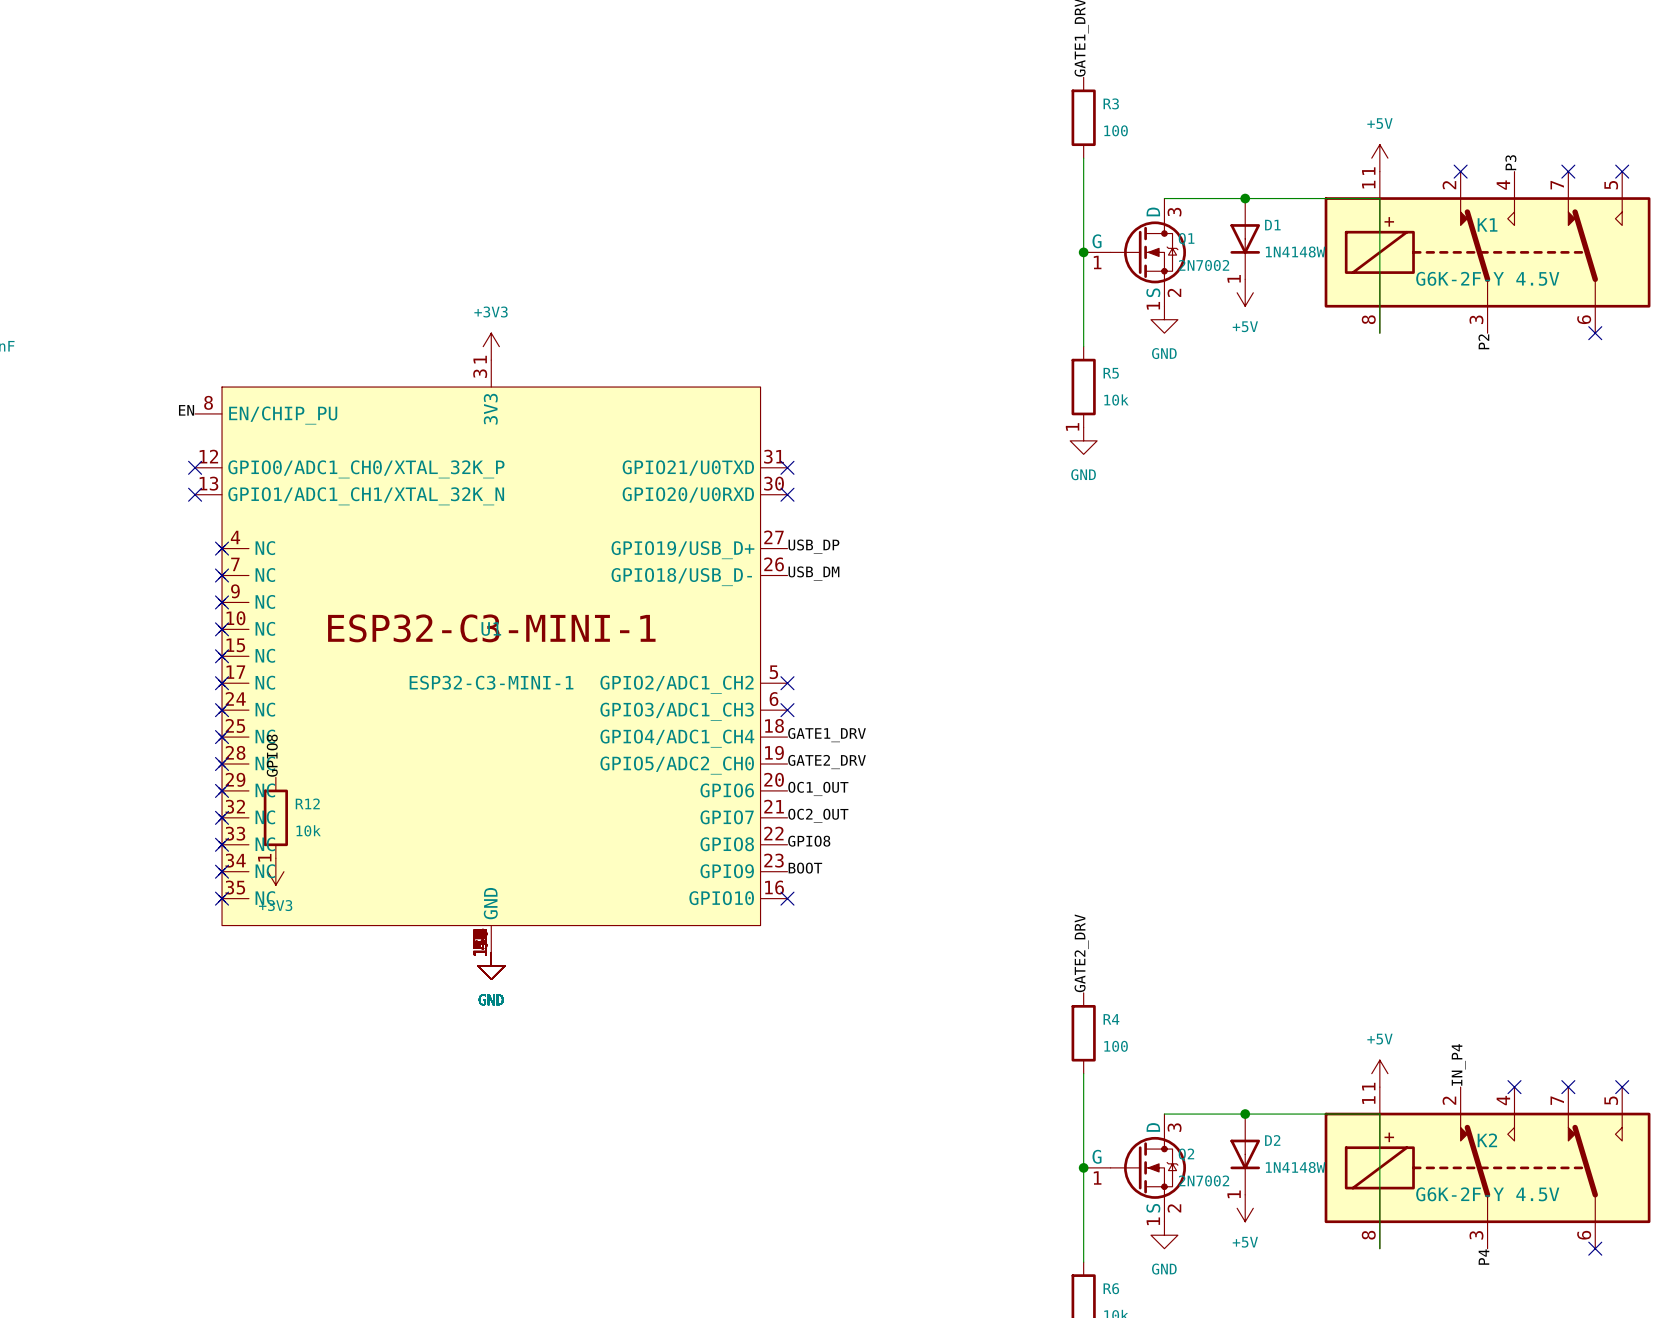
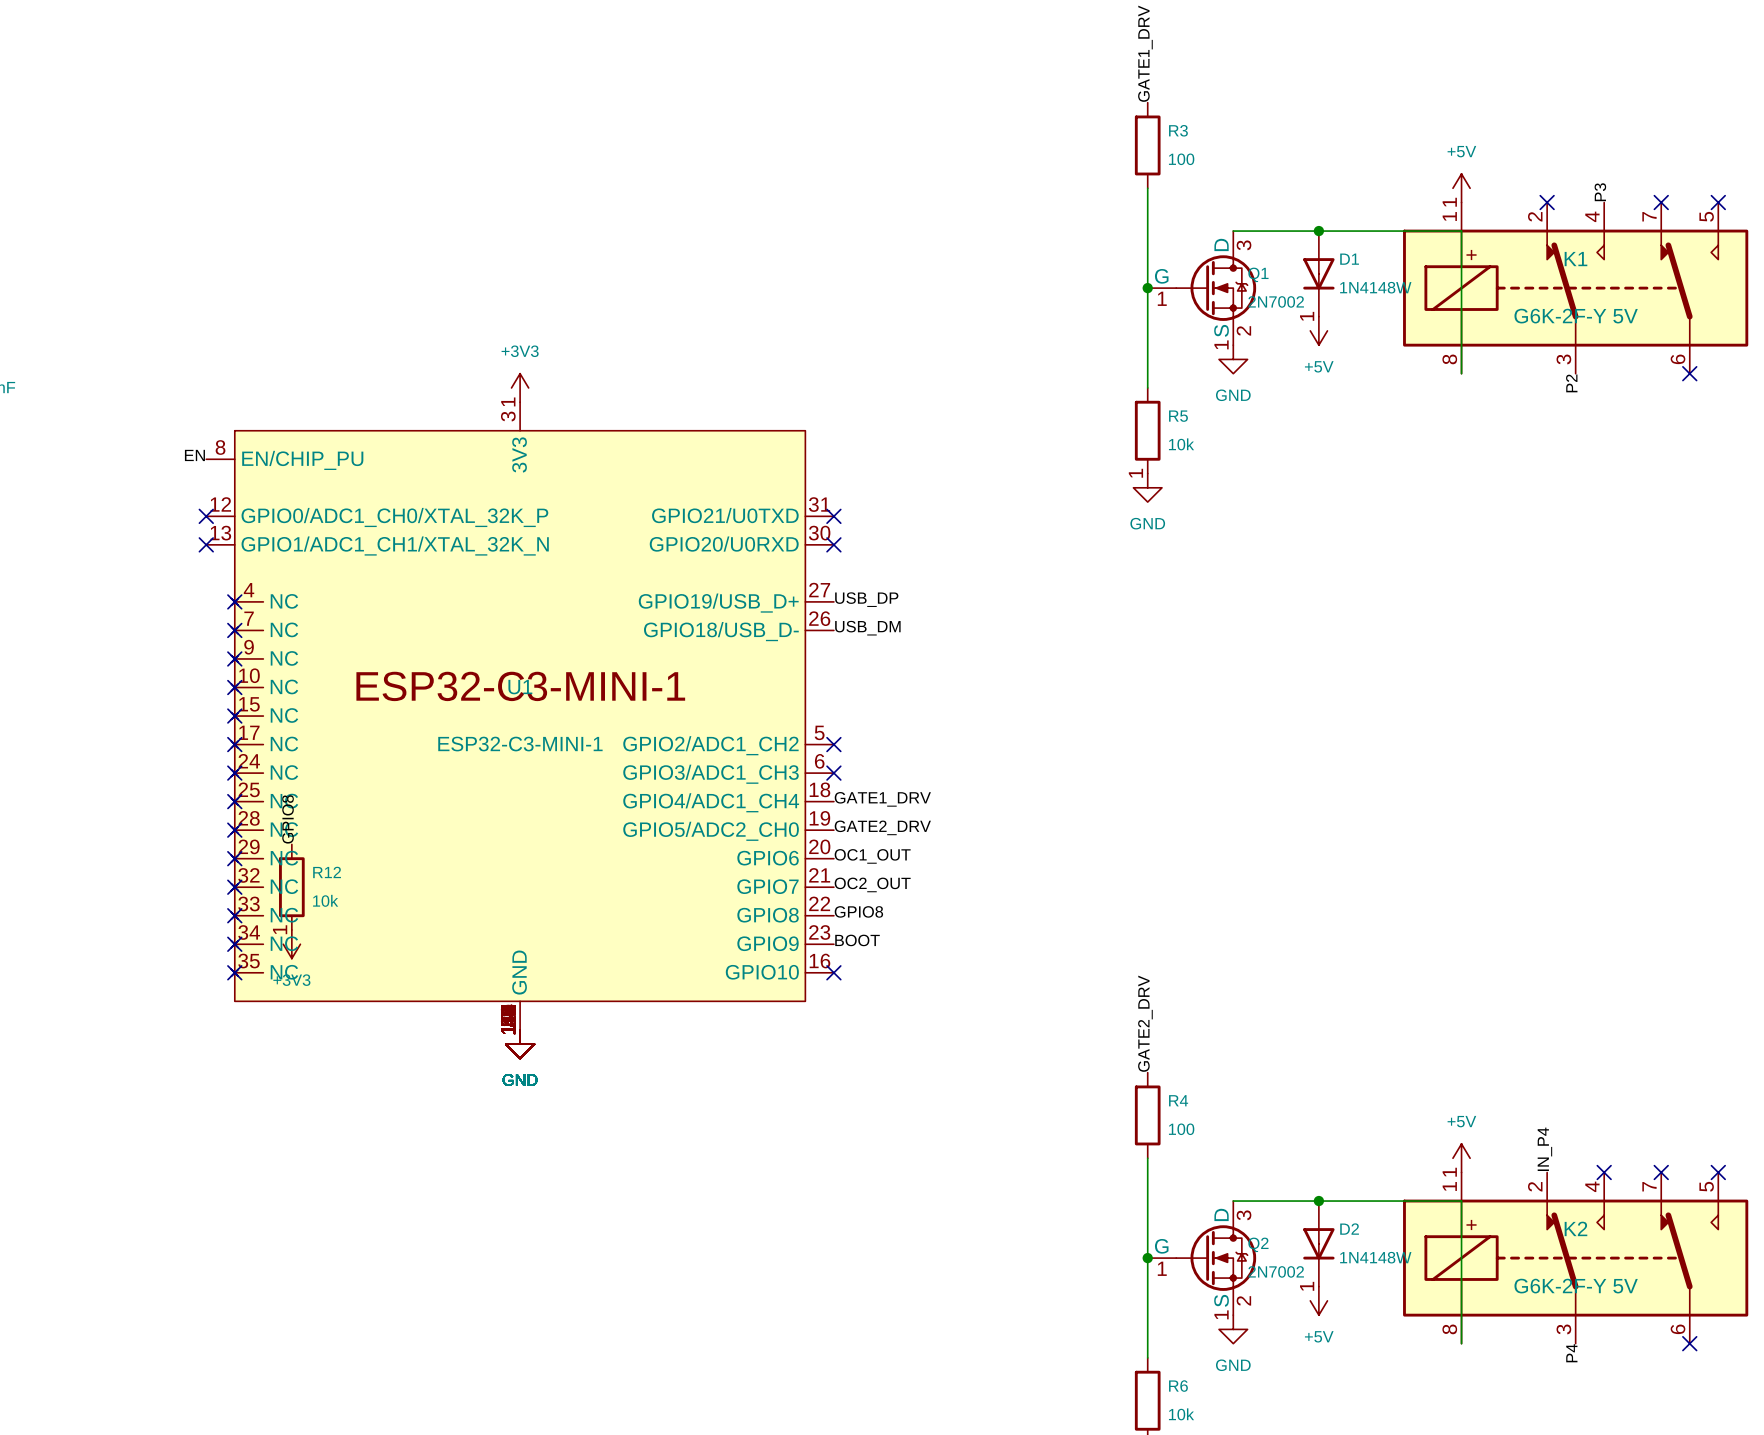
K1 value: G6K-2F-Y 4.5V (1487, 278) -> G6K-2F-Y 5V (1576, 316)
K2 value: G6K-2F-Y 4.5V (1487, 1194) -> G6K-2F-Y 5V (1576, 1286)

